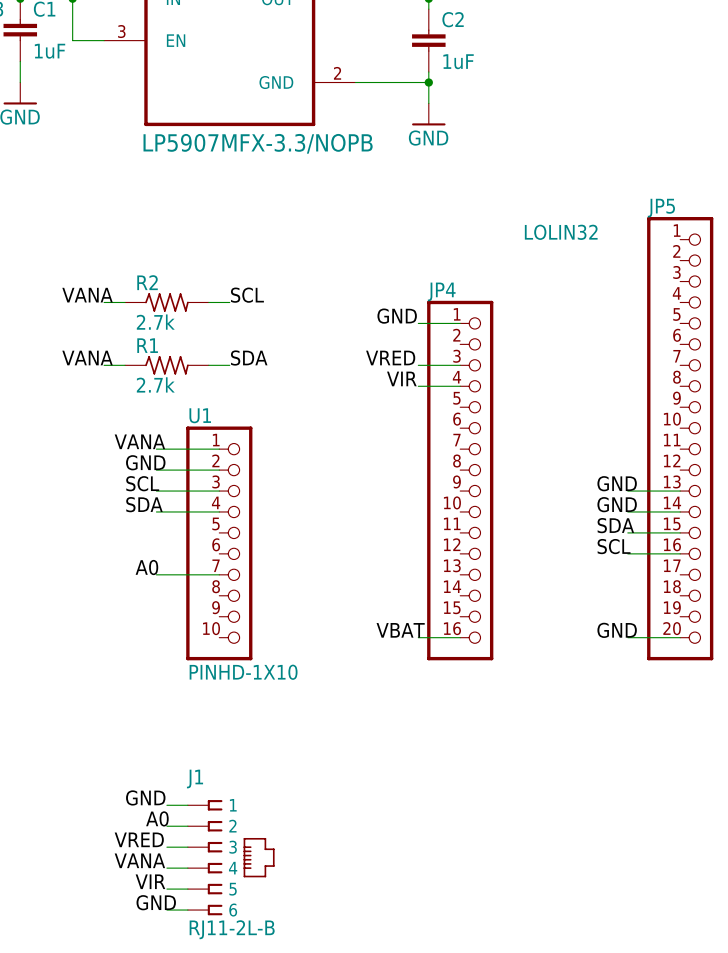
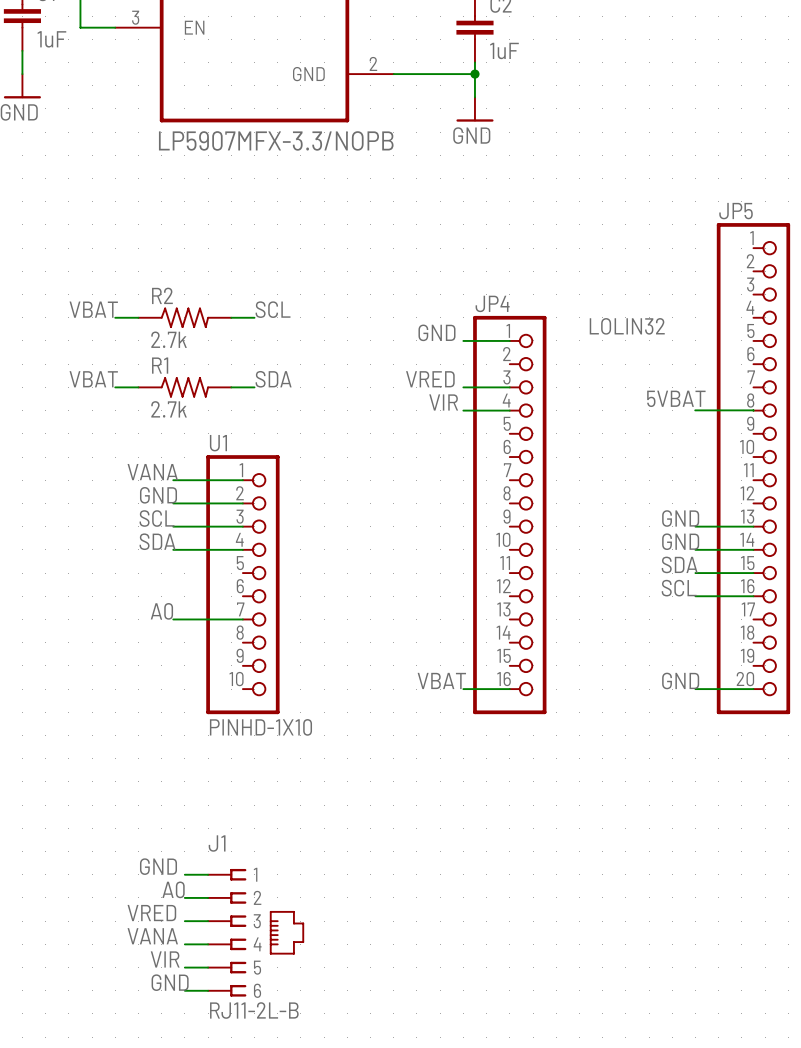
text position: LOLIN32 (561, 232) -> LOLIN32 (627, 326)
label: VANA (87, 295) -> VBAT (93, 309)
label: VANA (87, 358) -> VBAT (93, 379)
label: none -> 5VBAT (676, 398)
wire: none -> (695, 410) (753, 410)

